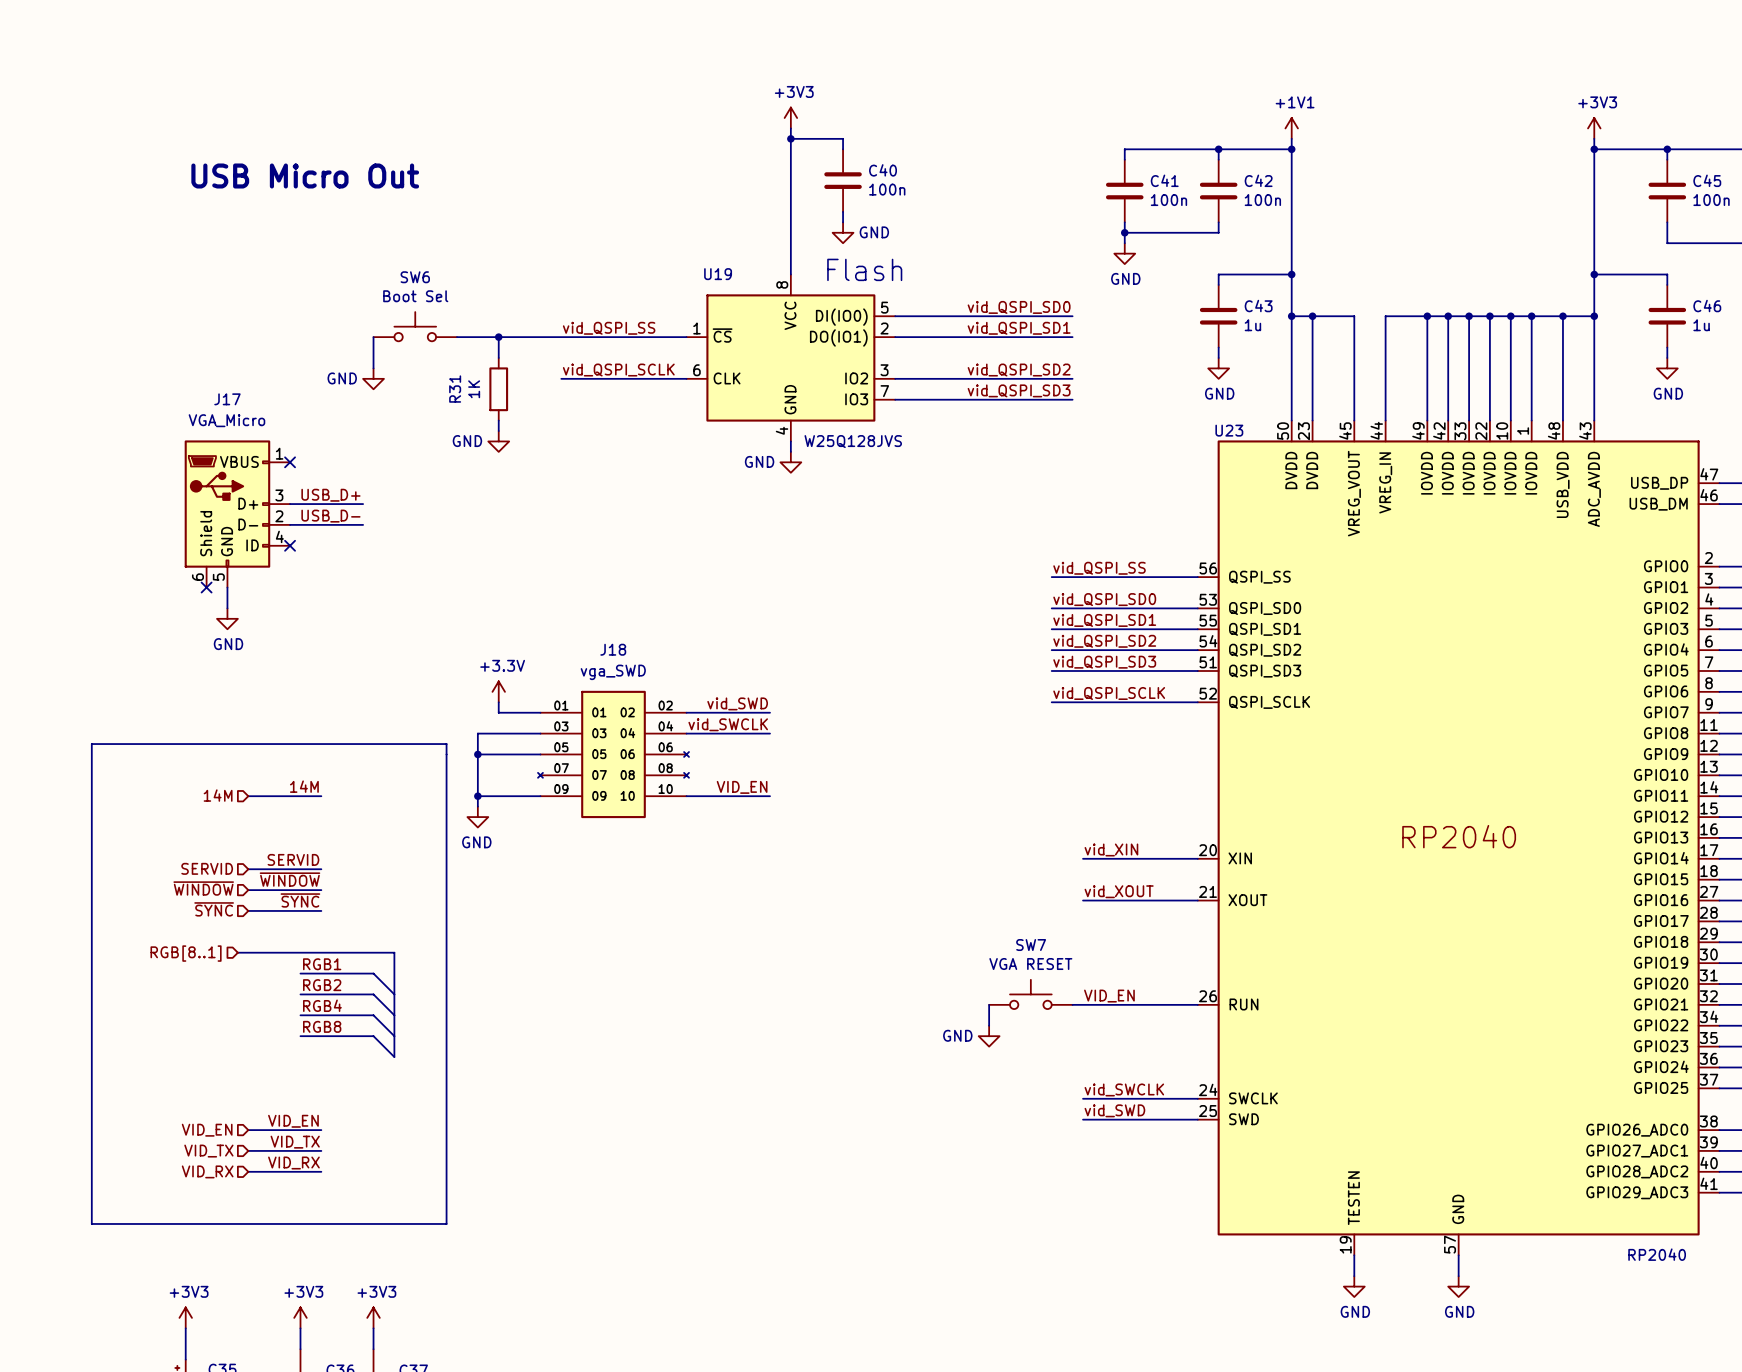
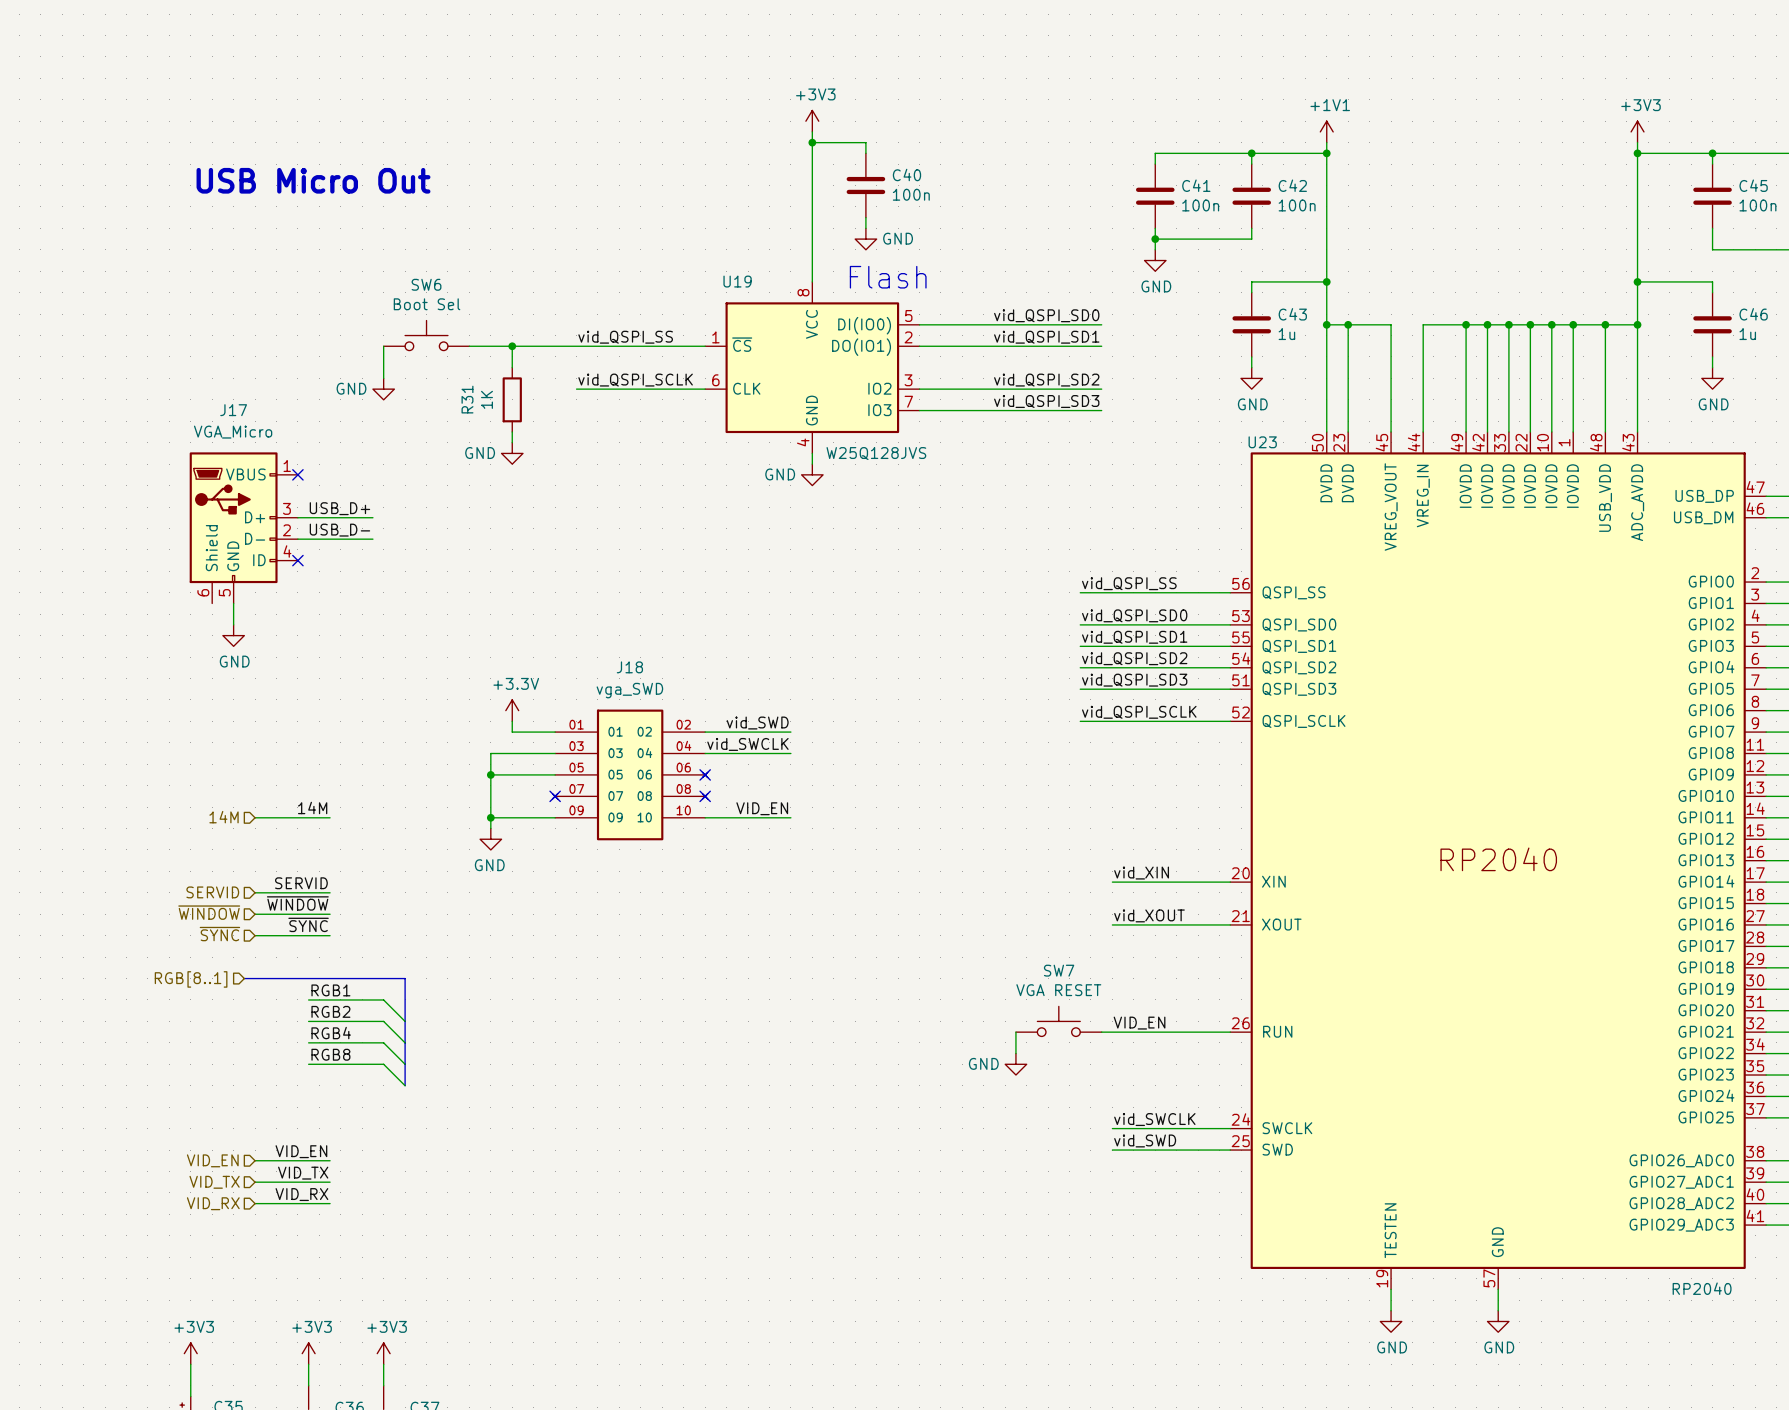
no-connect mark: (206, 587) -> none
line: (91, 744) (446, 744) (446, 1223) (91, 1223) (91, 744) -> none
no-connect mark: none -> (705, 774)
no-connect mark: none -> (555, 796)
no-connect mark: none -> (705, 796)

